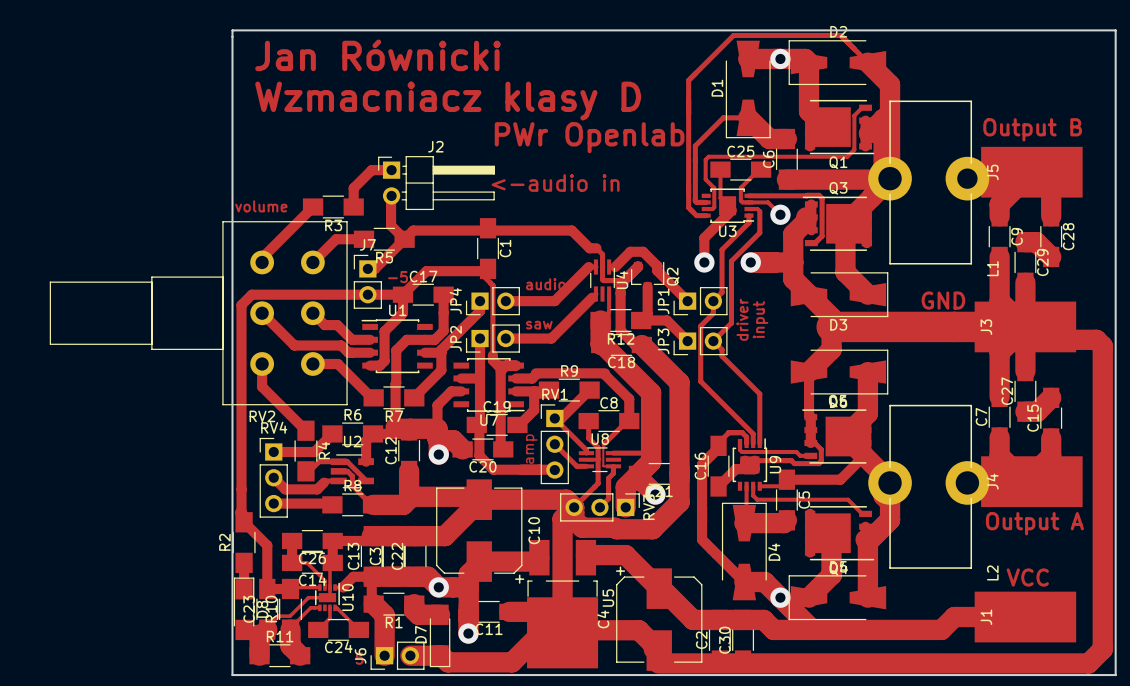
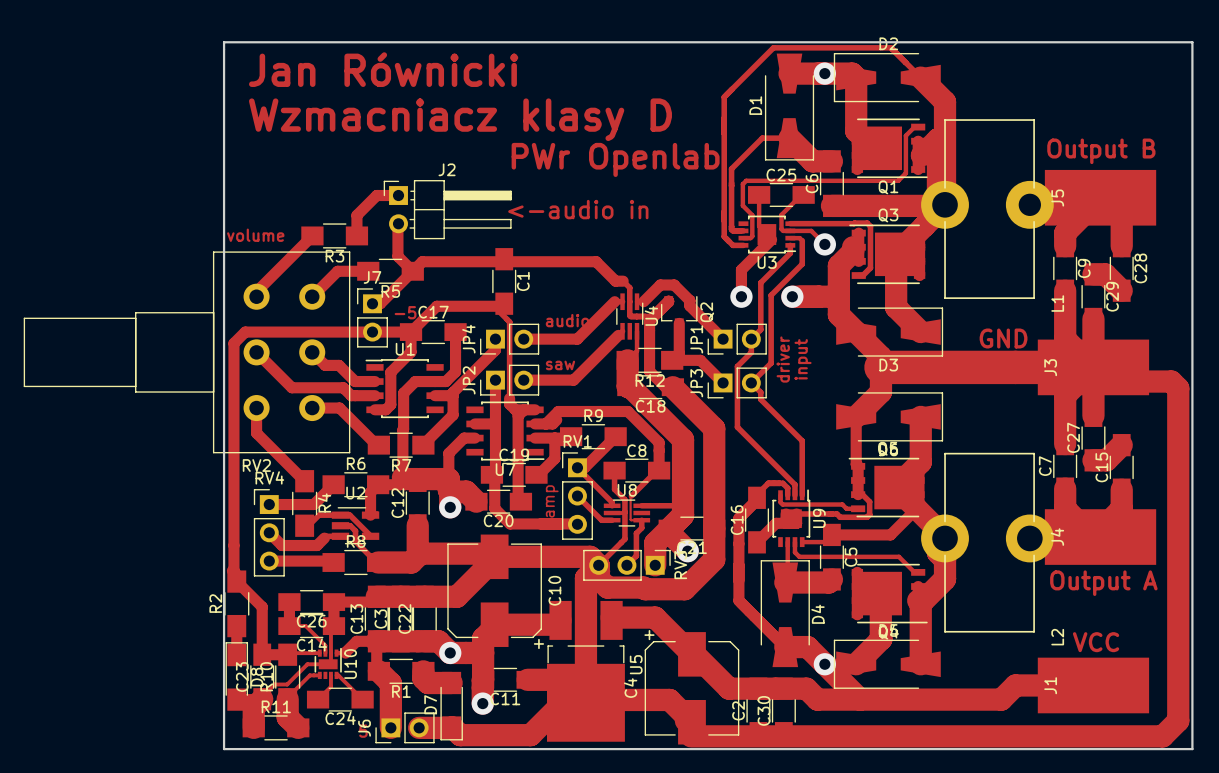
track: (535, 373) (605, 373) -> none
track: (605, 374) (629, 399) -> (545, 423) (558, 411) (627, 411) (659, 442) (659, 446)

